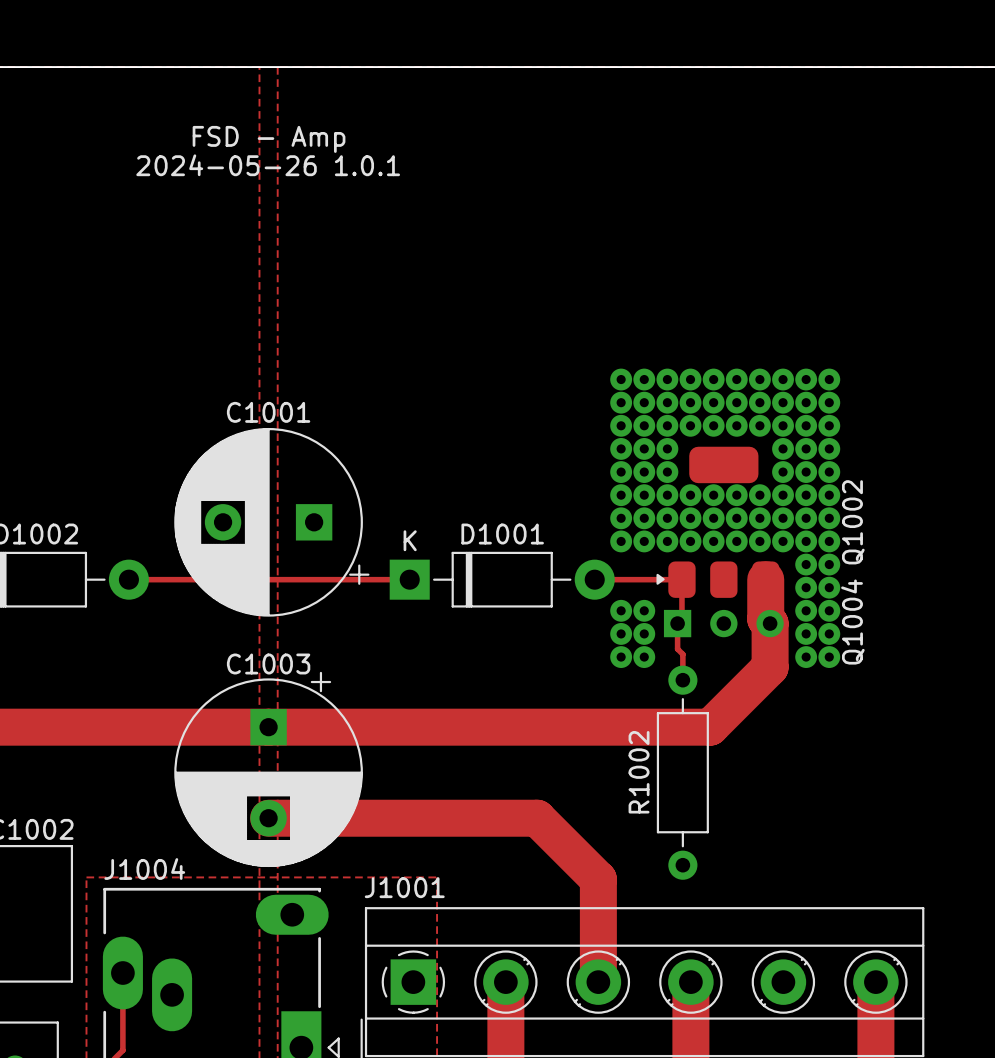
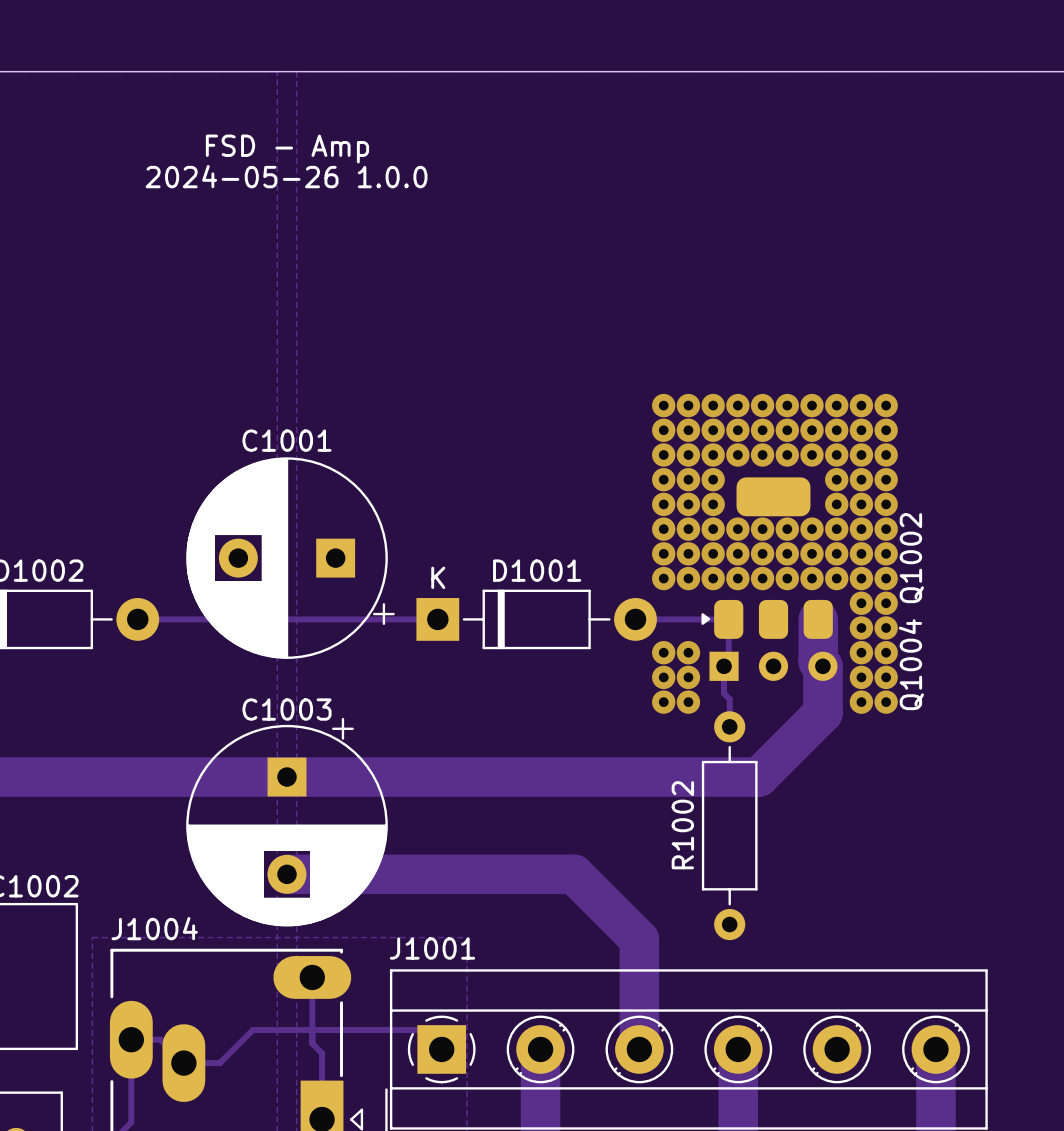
text: 2024-05-26 1.0.1 (268, 165) -> 2024-05-26 1.0.0 (286, 176)
track: none -> (312, 977) (312, 1043) (322, 1053) (322, 1119)
track: none -> (422, 1030) (252, 1030) (219, 1063) (183, 1063) (160, 1039) (131, 1039)

